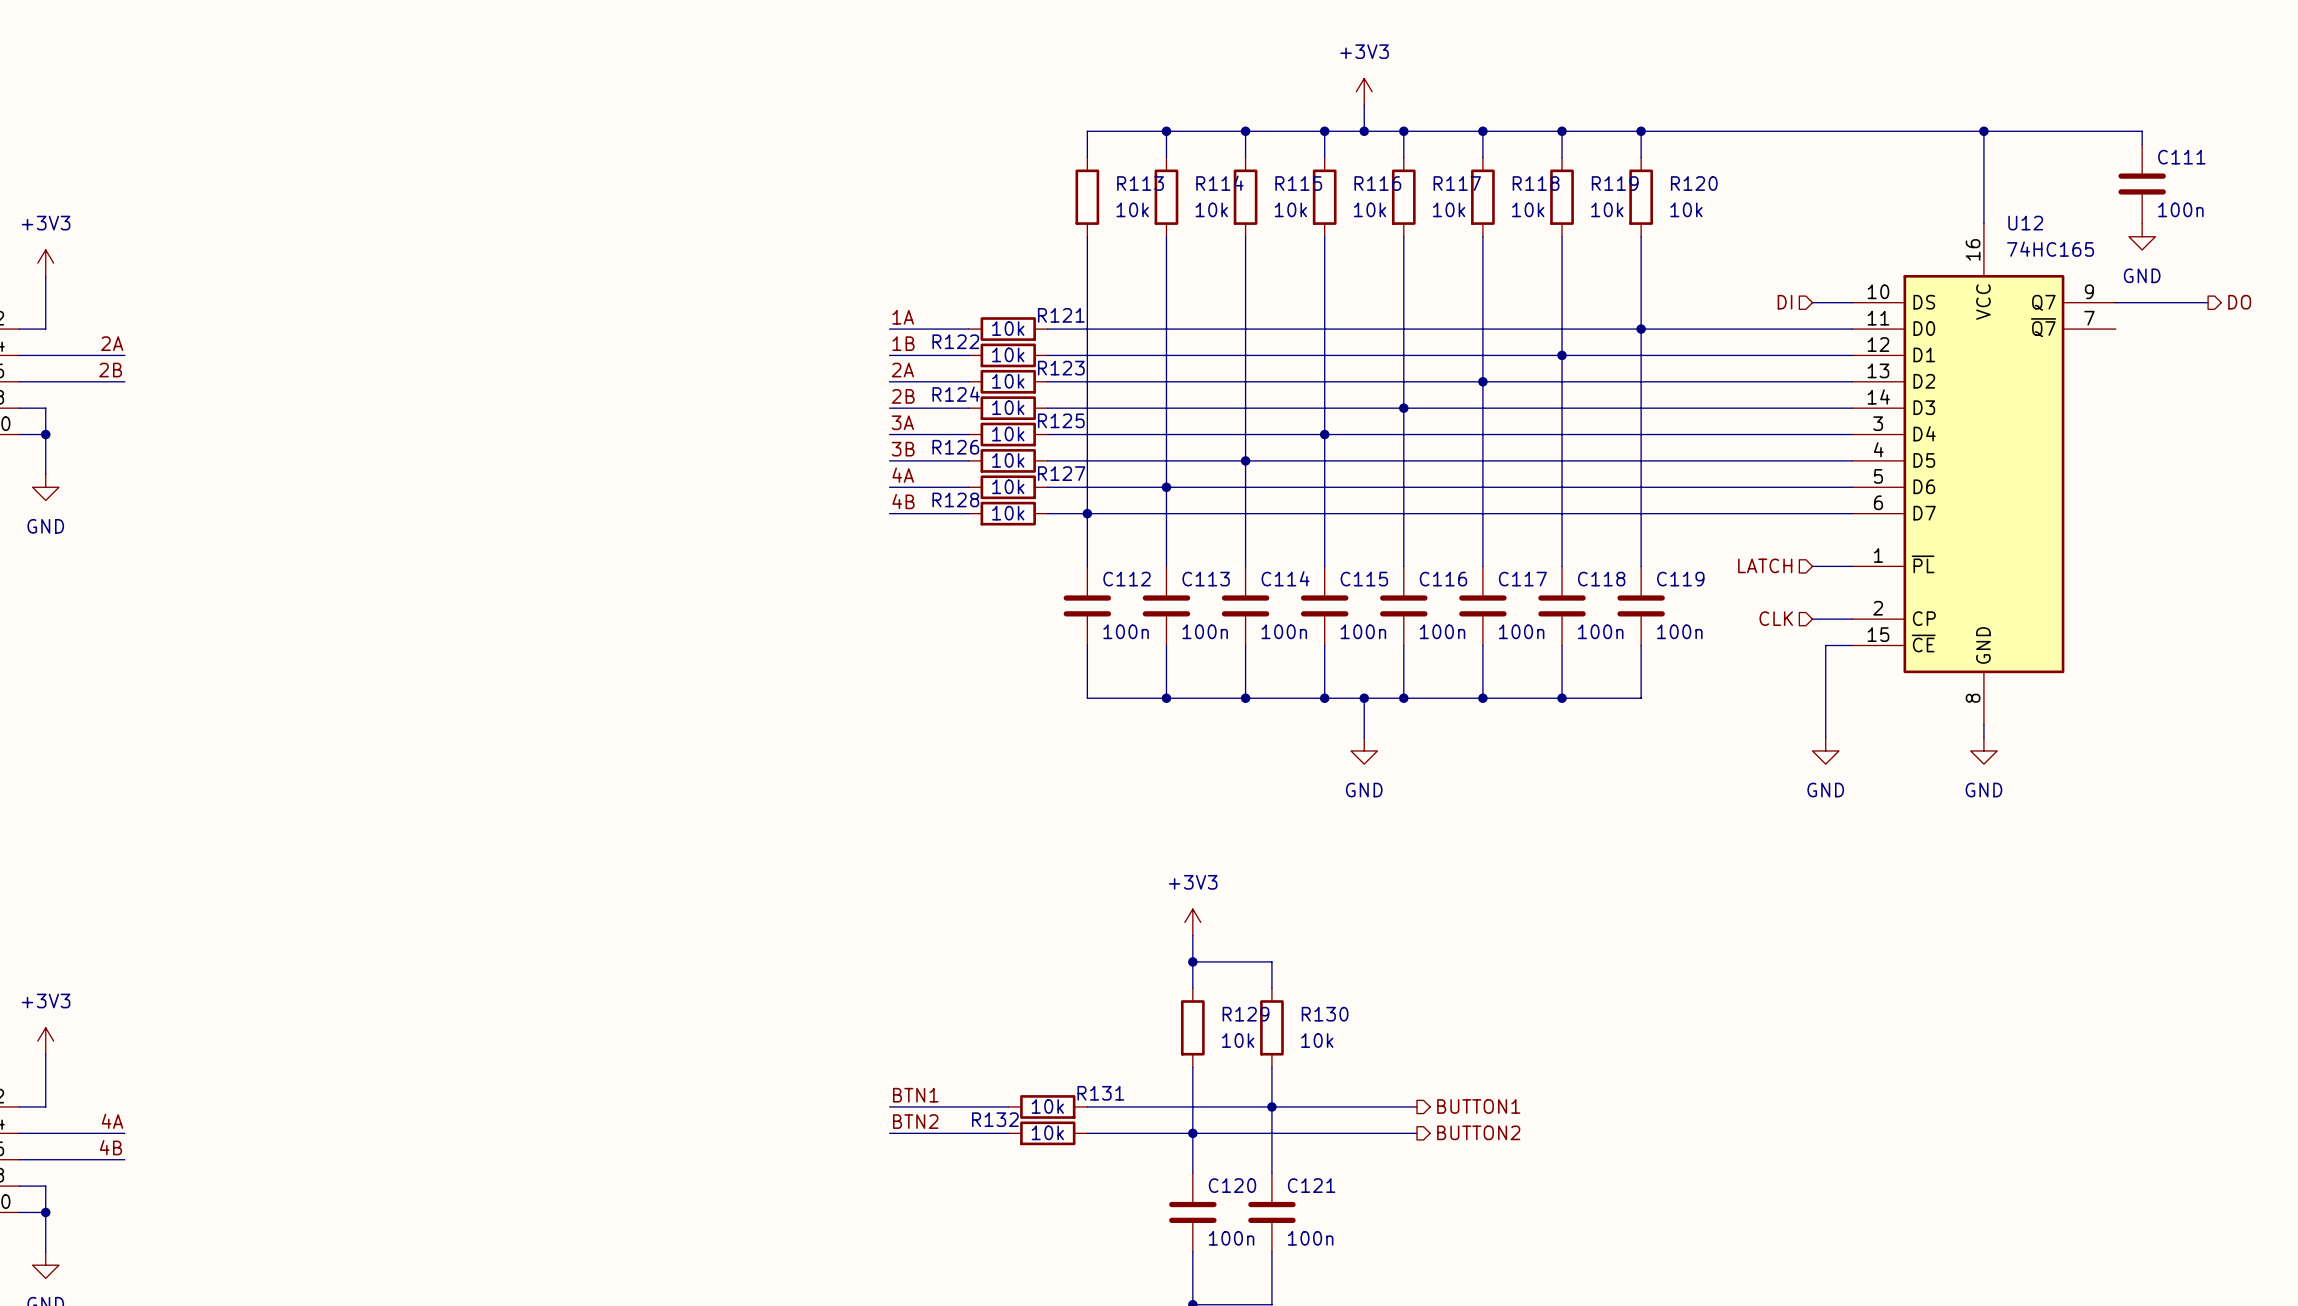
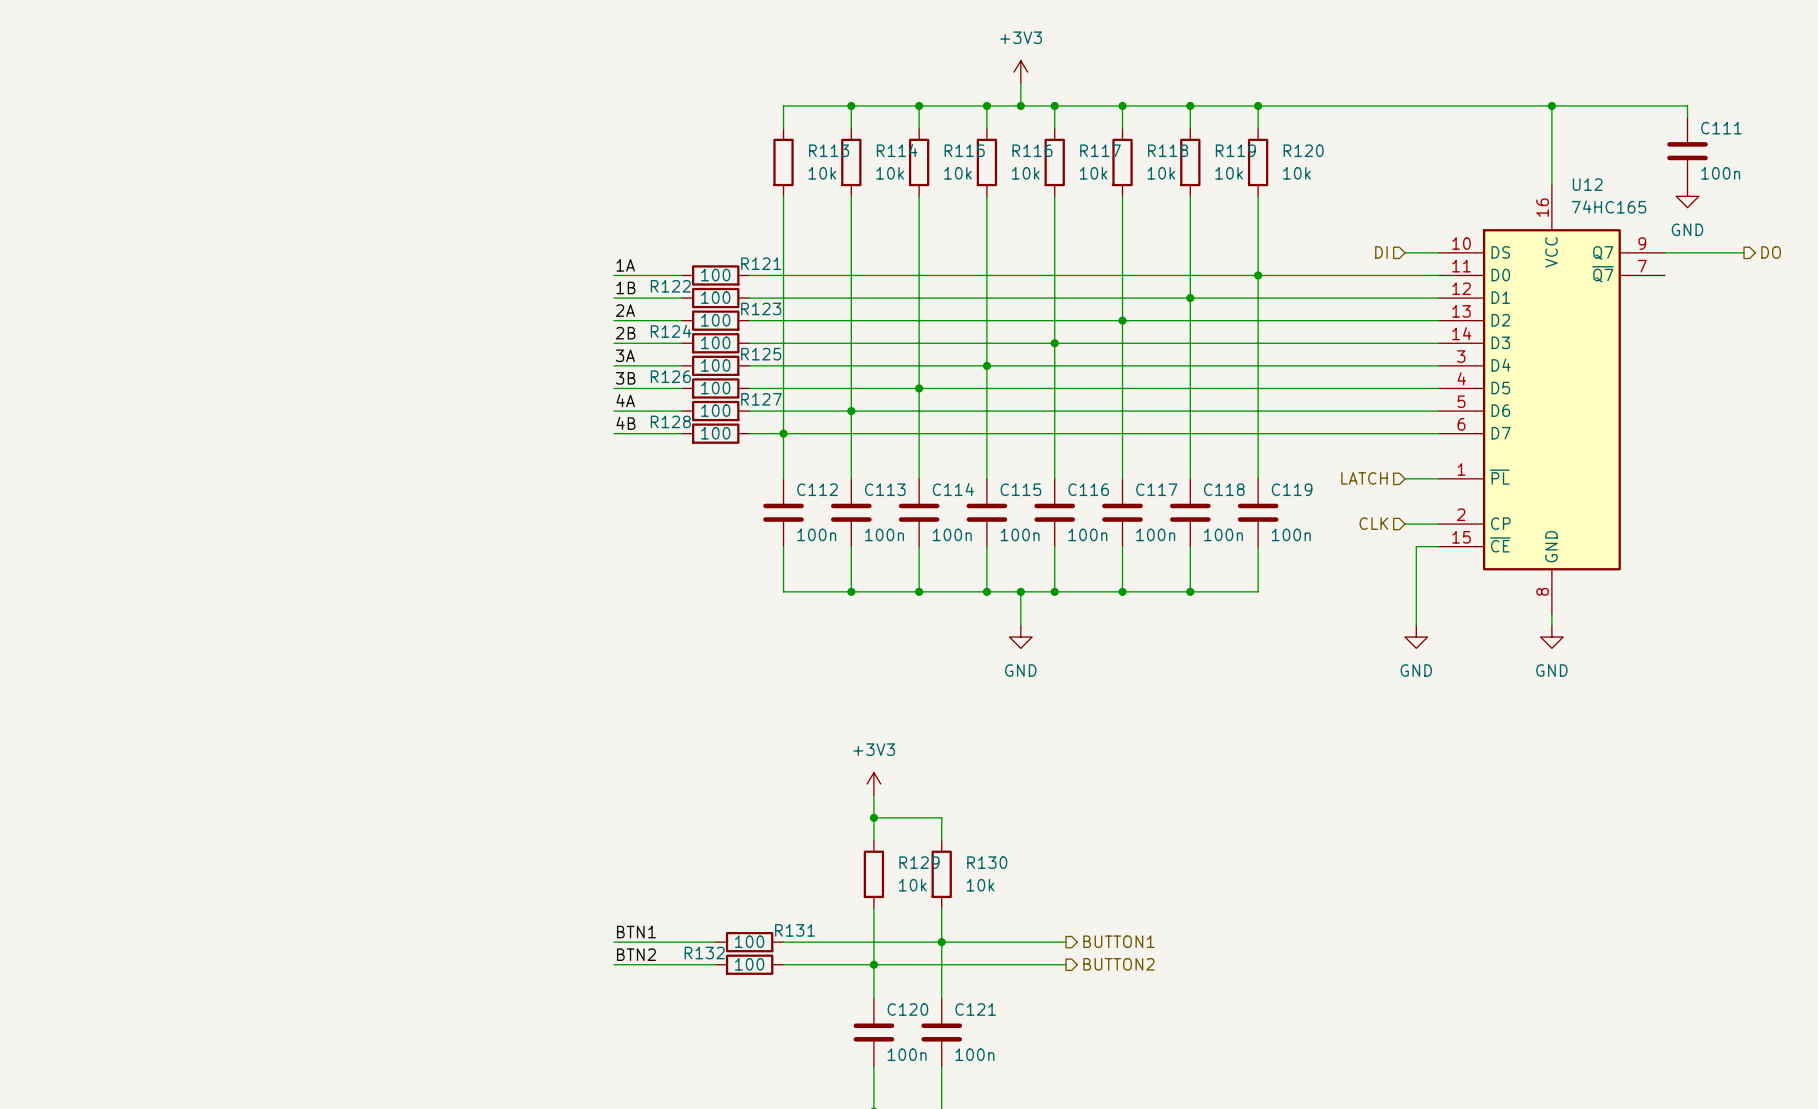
R121 value: 10k (1008, 328) -> 100 (715, 275)
R122 value: 10k (1008, 354) -> 100 (715, 297)
R123 value: 10k (1008, 381) -> 100 (715, 320)
R124 value: 10k (1008, 407) -> 100 (715, 342)
R125 value: 10k (1008, 434) -> 100 (715, 365)
R126 value: 10k (1008, 460) -> 100 (715, 388)
R127 value: 10k (1008, 486) -> 100 (715, 410)
R128 value: 10k (1008, 513) -> 100 (715, 433)
R131 value: 10k (1047, 1106) -> 100 (749, 941)
R132 value: 10k (1047, 1132) -> 100 (749, 964)

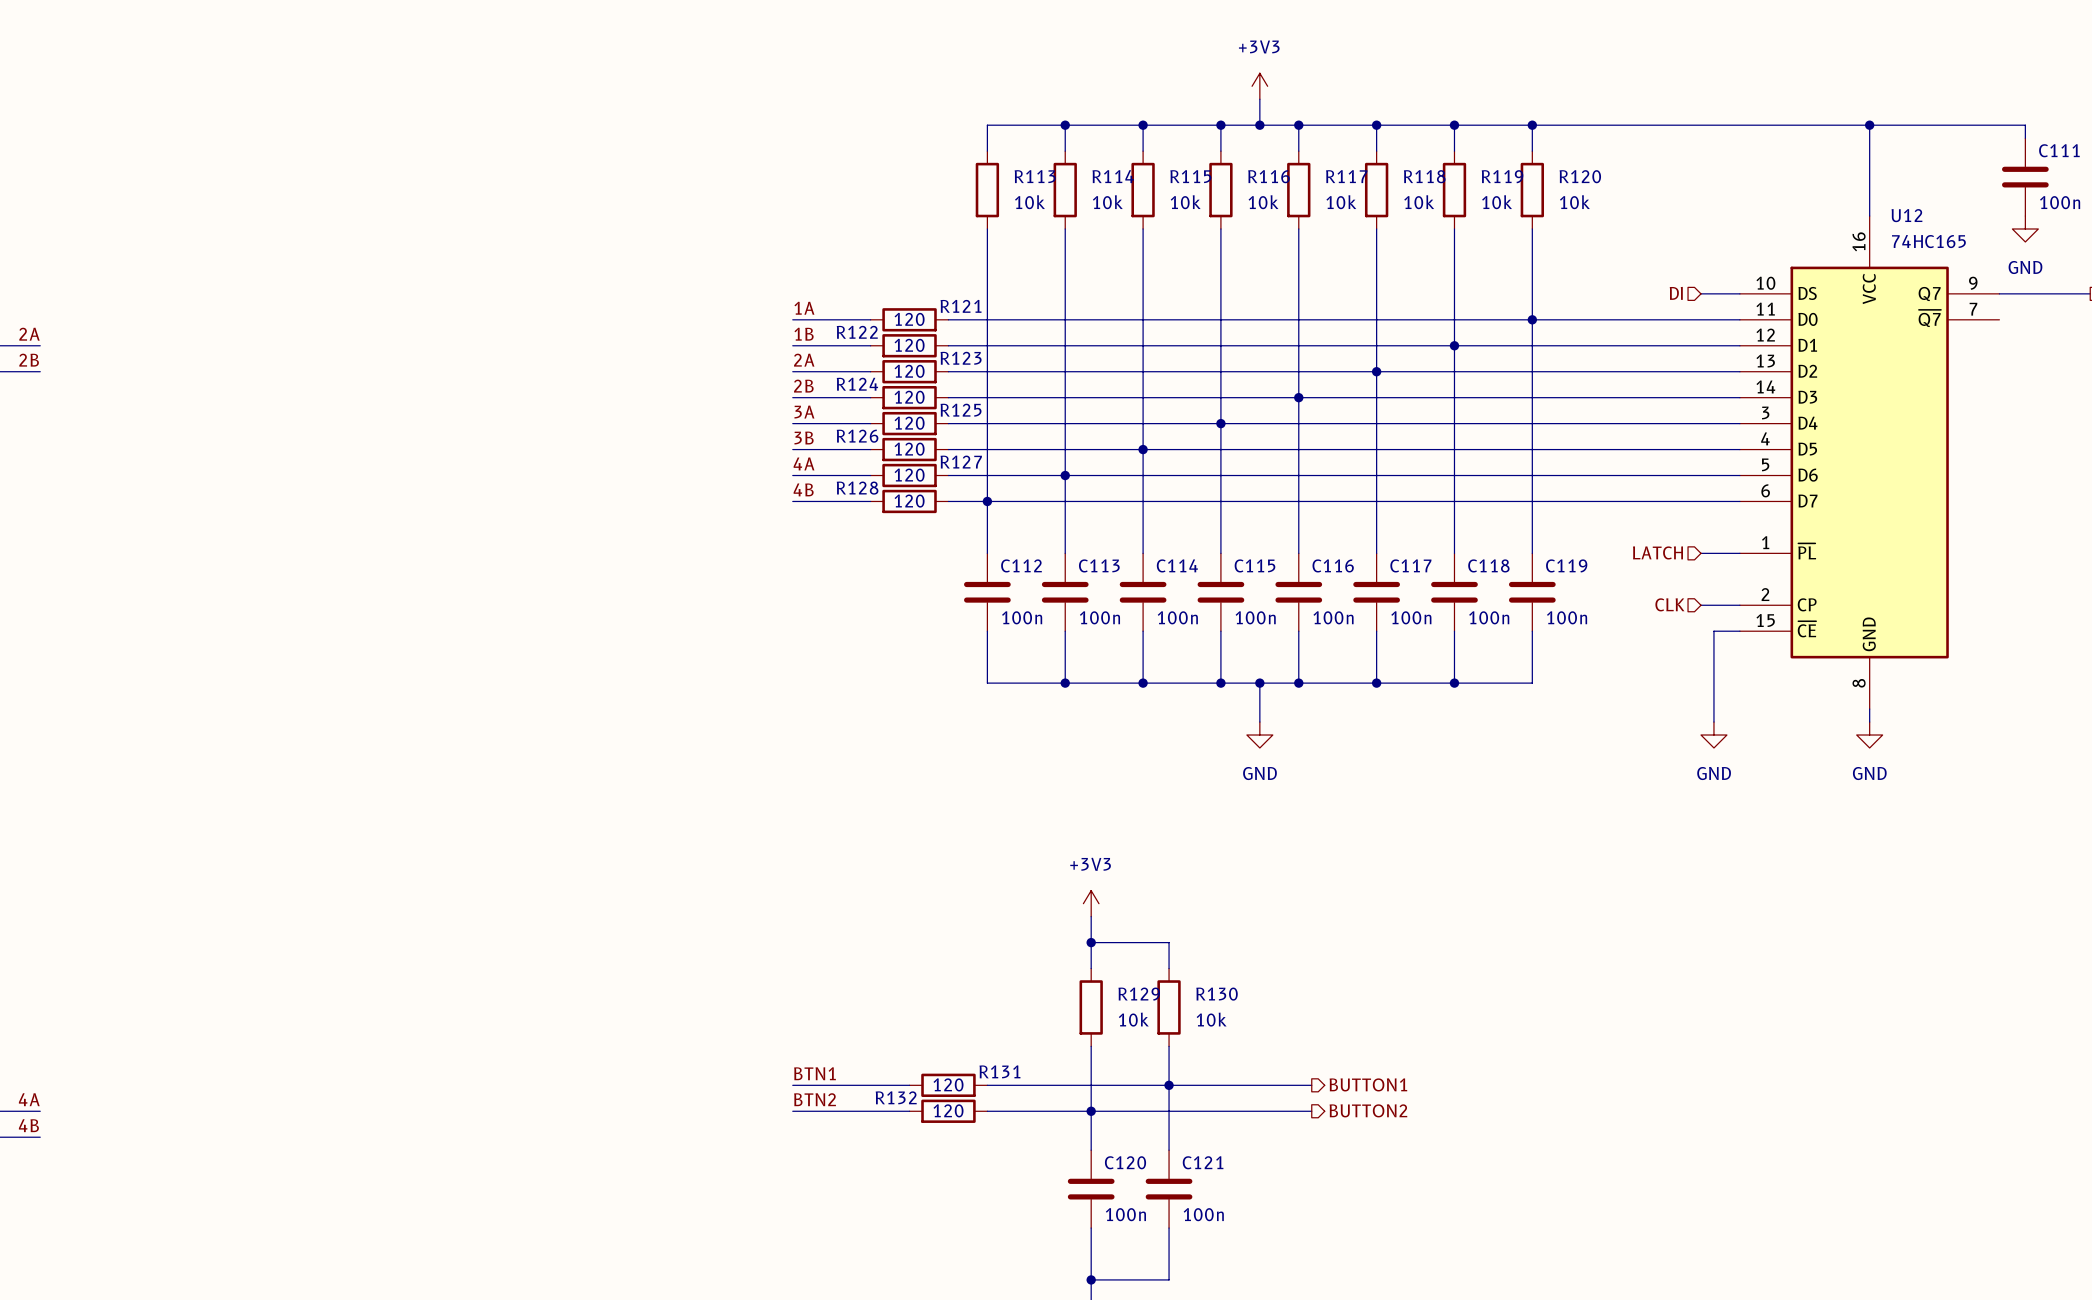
R121 value: 100 (715, 275) -> 120 (909, 319)
R122 value: 100 (715, 297) -> 120 (909, 345)
R123 value: 100 (715, 320) -> 120 (909, 371)
R124 value: 100 (715, 342) -> 120 (909, 397)
R125 value: 100 (715, 365) -> 120 (909, 423)
R126 value: 100 (715, 388) -> 120 (909, 449)
R127 value: 100 (715, 410) -> 120 (909, 475)
R128 value: 100 (715, 433) -> 120 (909, 501)
R131 value: 100 (749, 941) -> 120 (948, 1084)
R132 value: 100 (749, 964) -> 120 (948, 1110)

